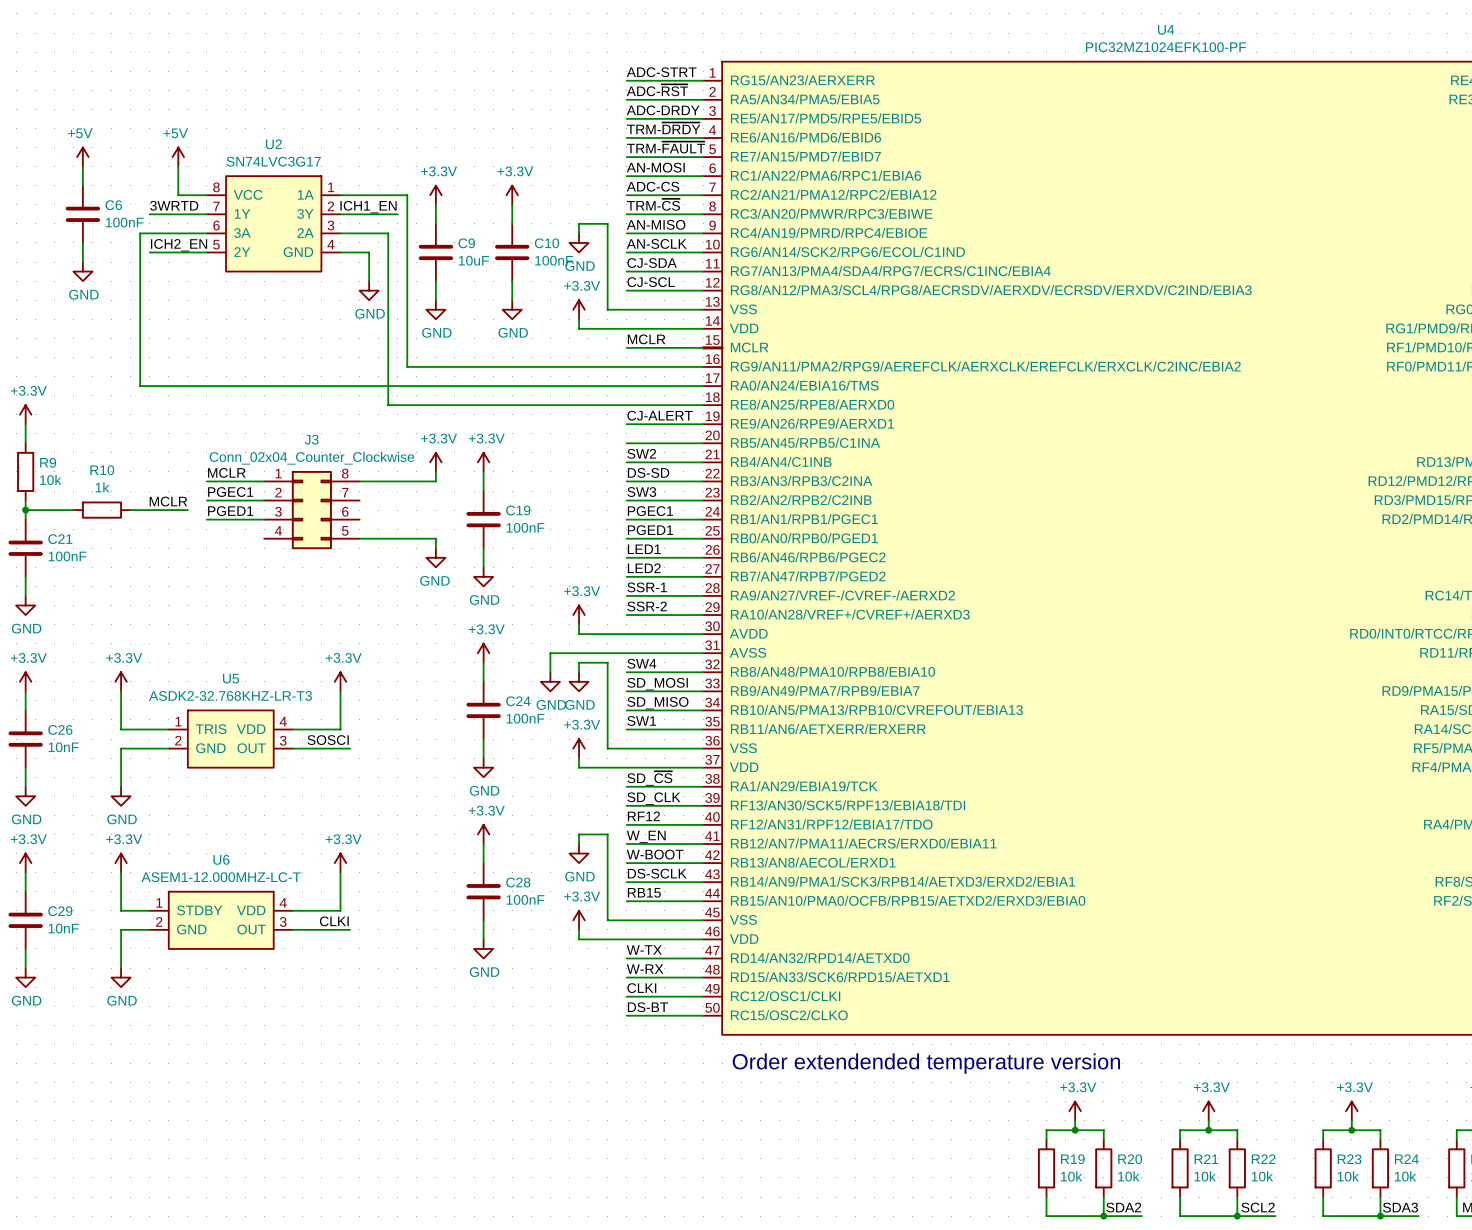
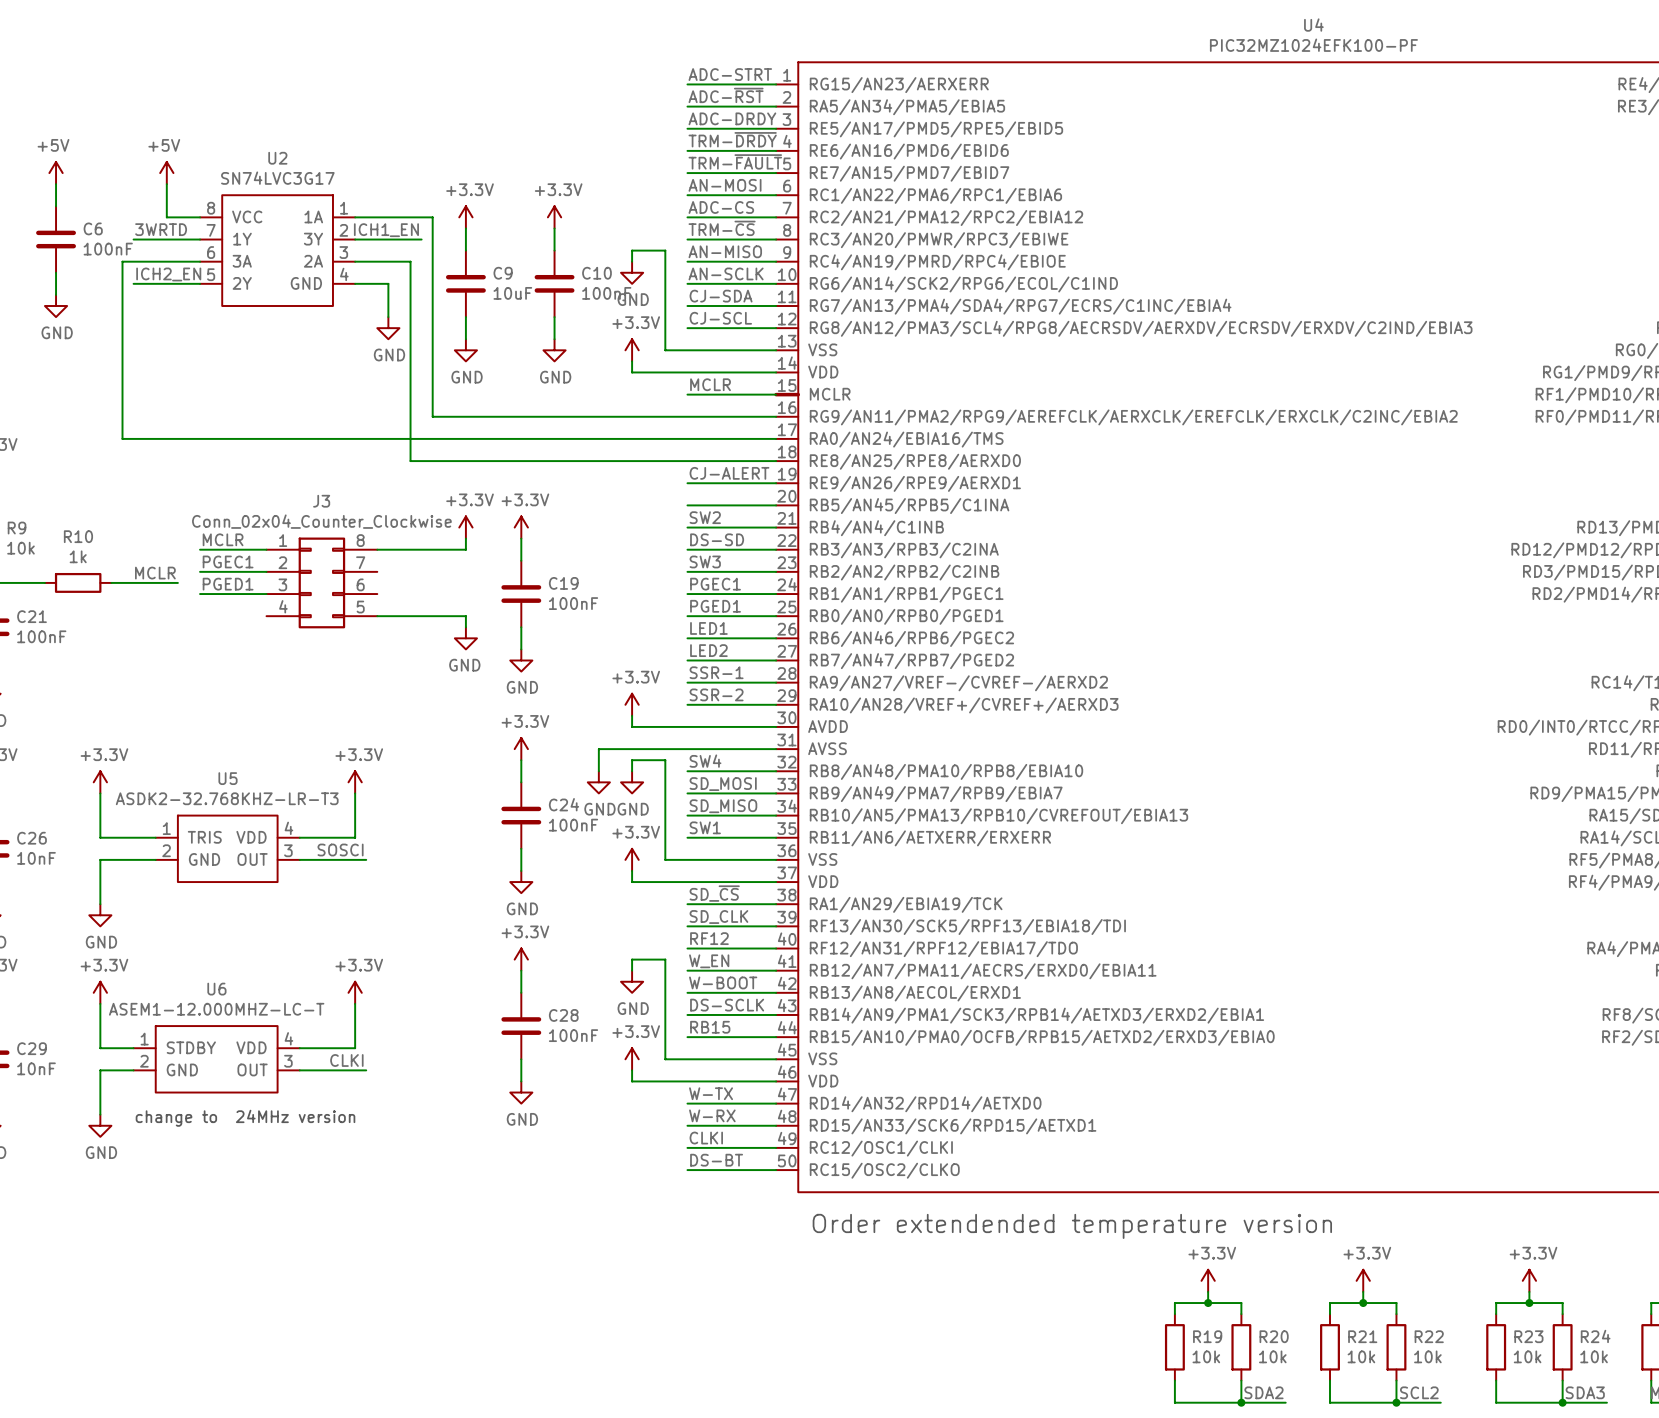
text: none -> change to 24MHz version (245, 1118)

